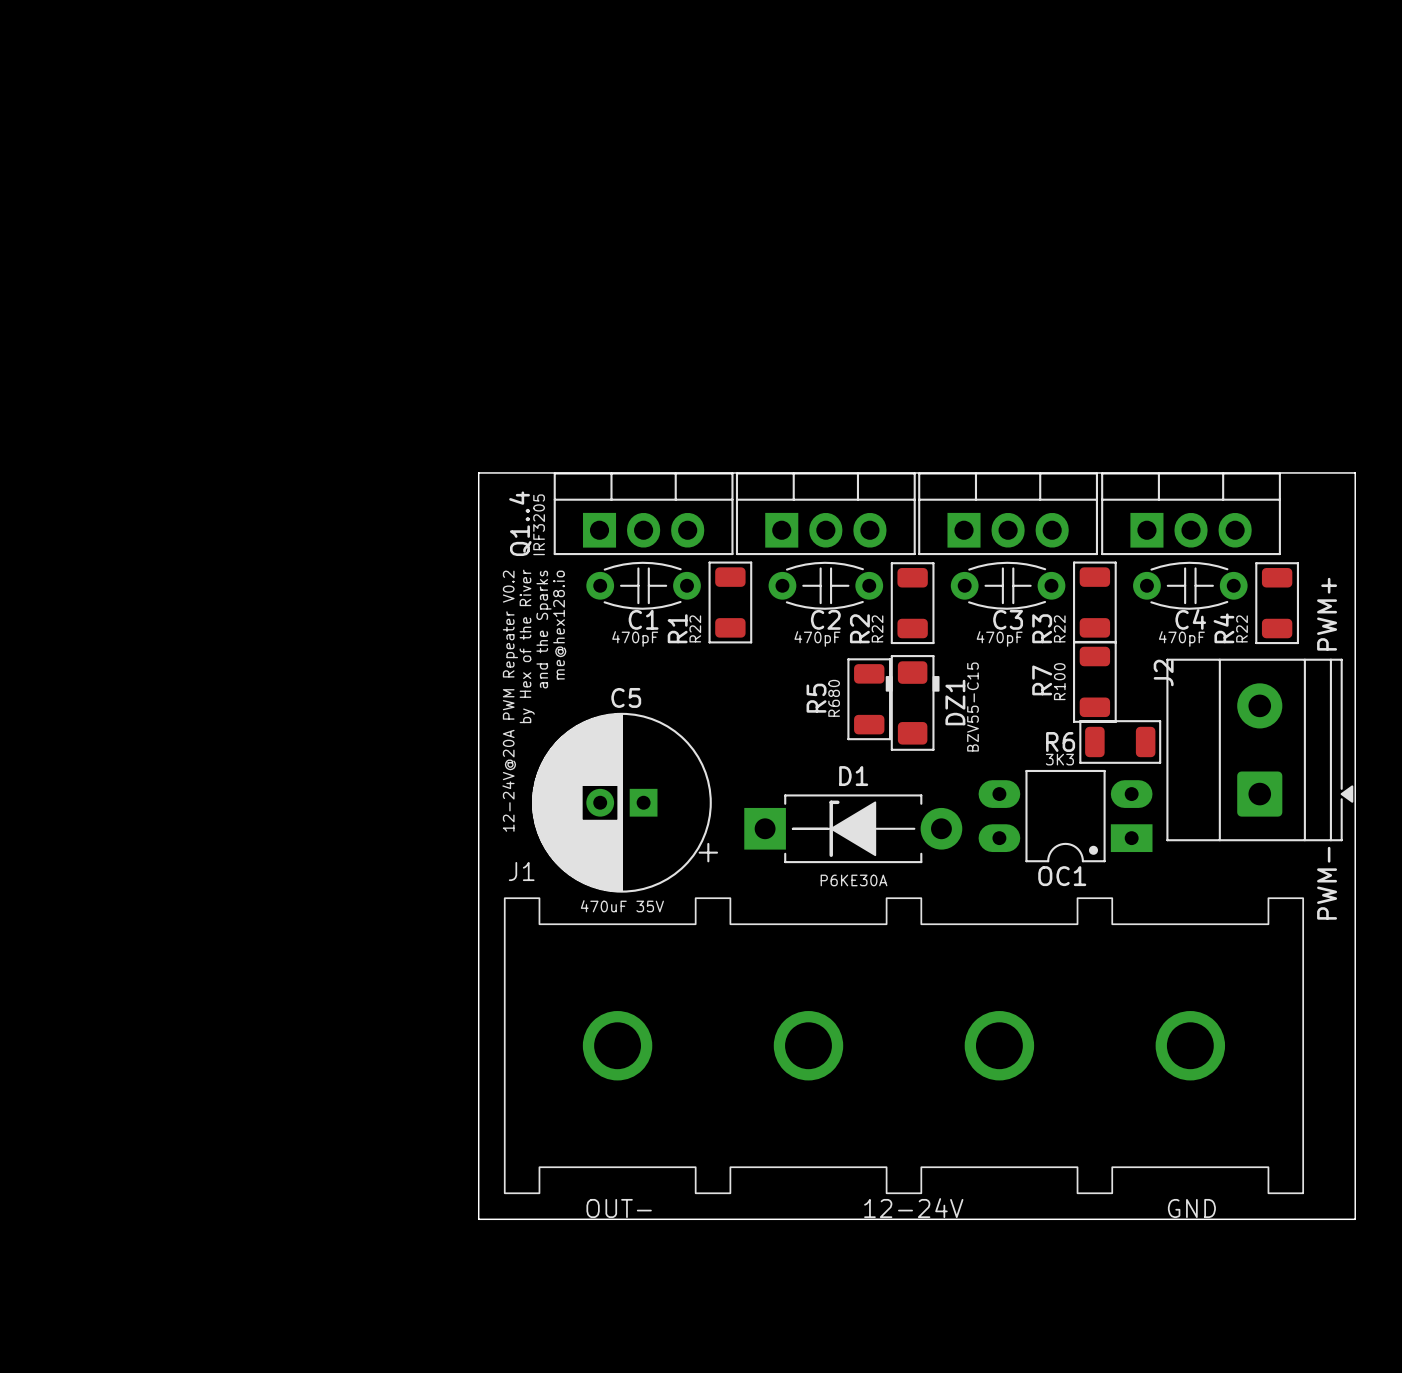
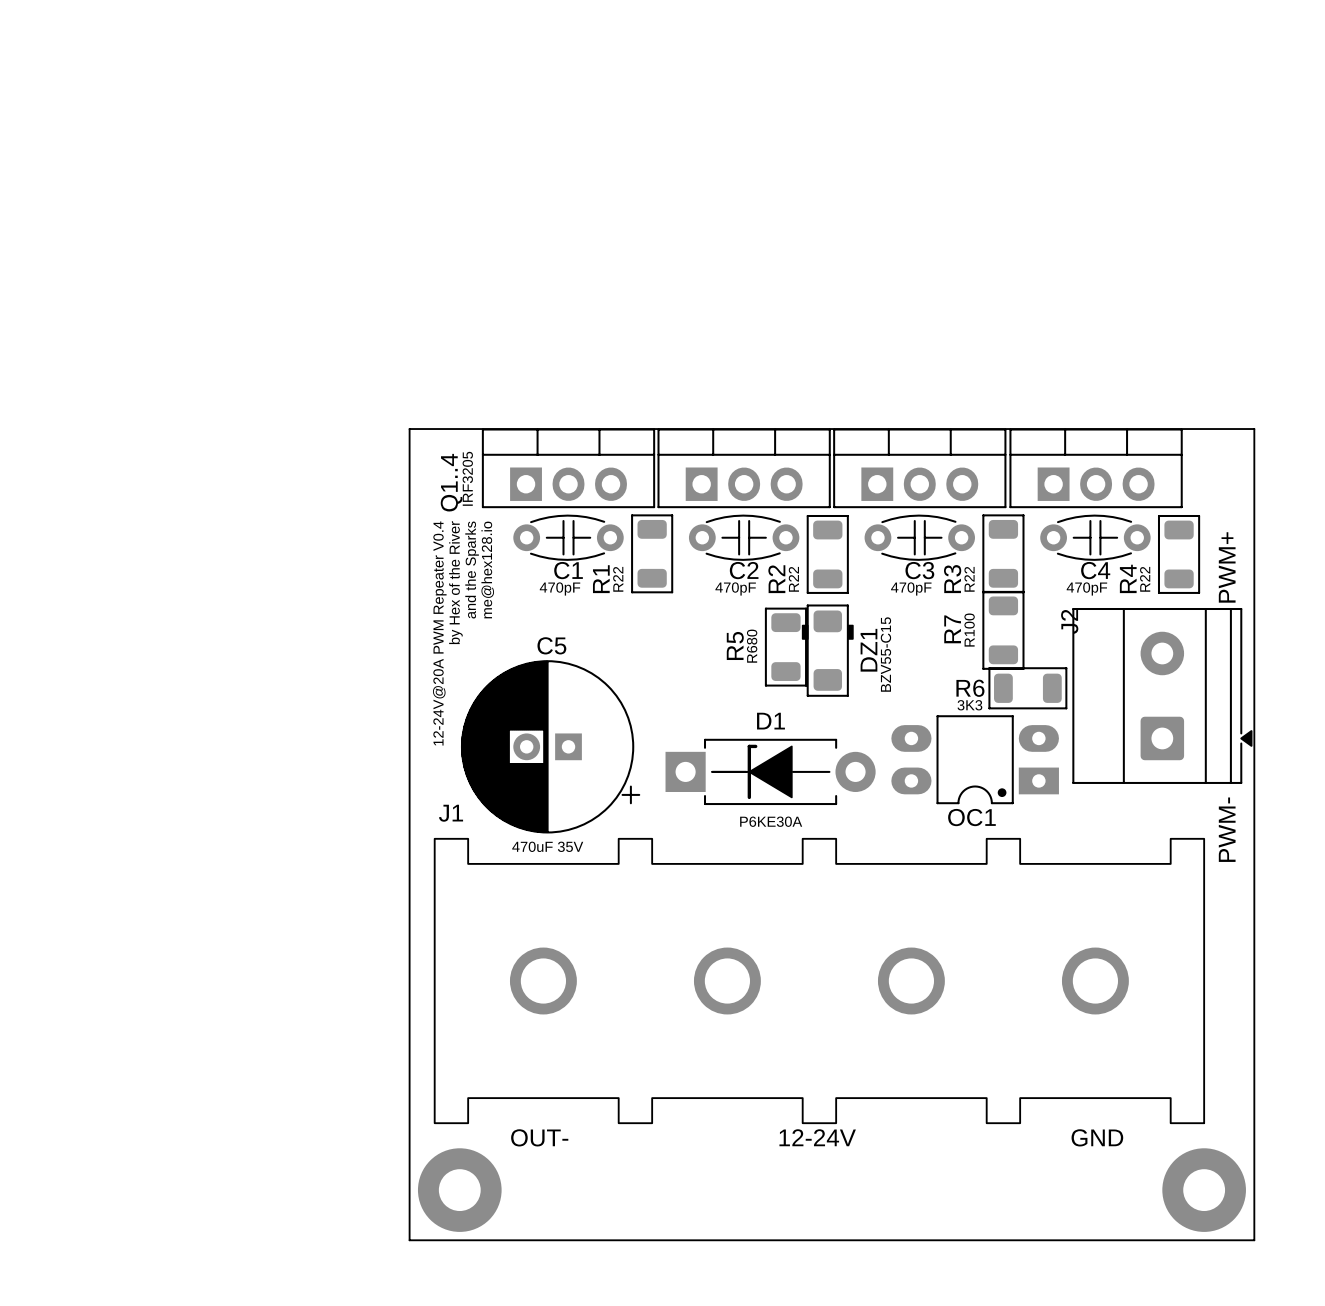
text: 12-24V@20A PWM Repeater V0.2 (510, 701) -> 12-24V@20A PWM Repeater V0.4 (439, 633)
board edge: (478, 1219) (1355, 1219) -> (409, 1148) (409, 1240) (1254, 1240) (1254, 1148)
part: none -> (459, 1190)
part: none -> (1204, 1190)

